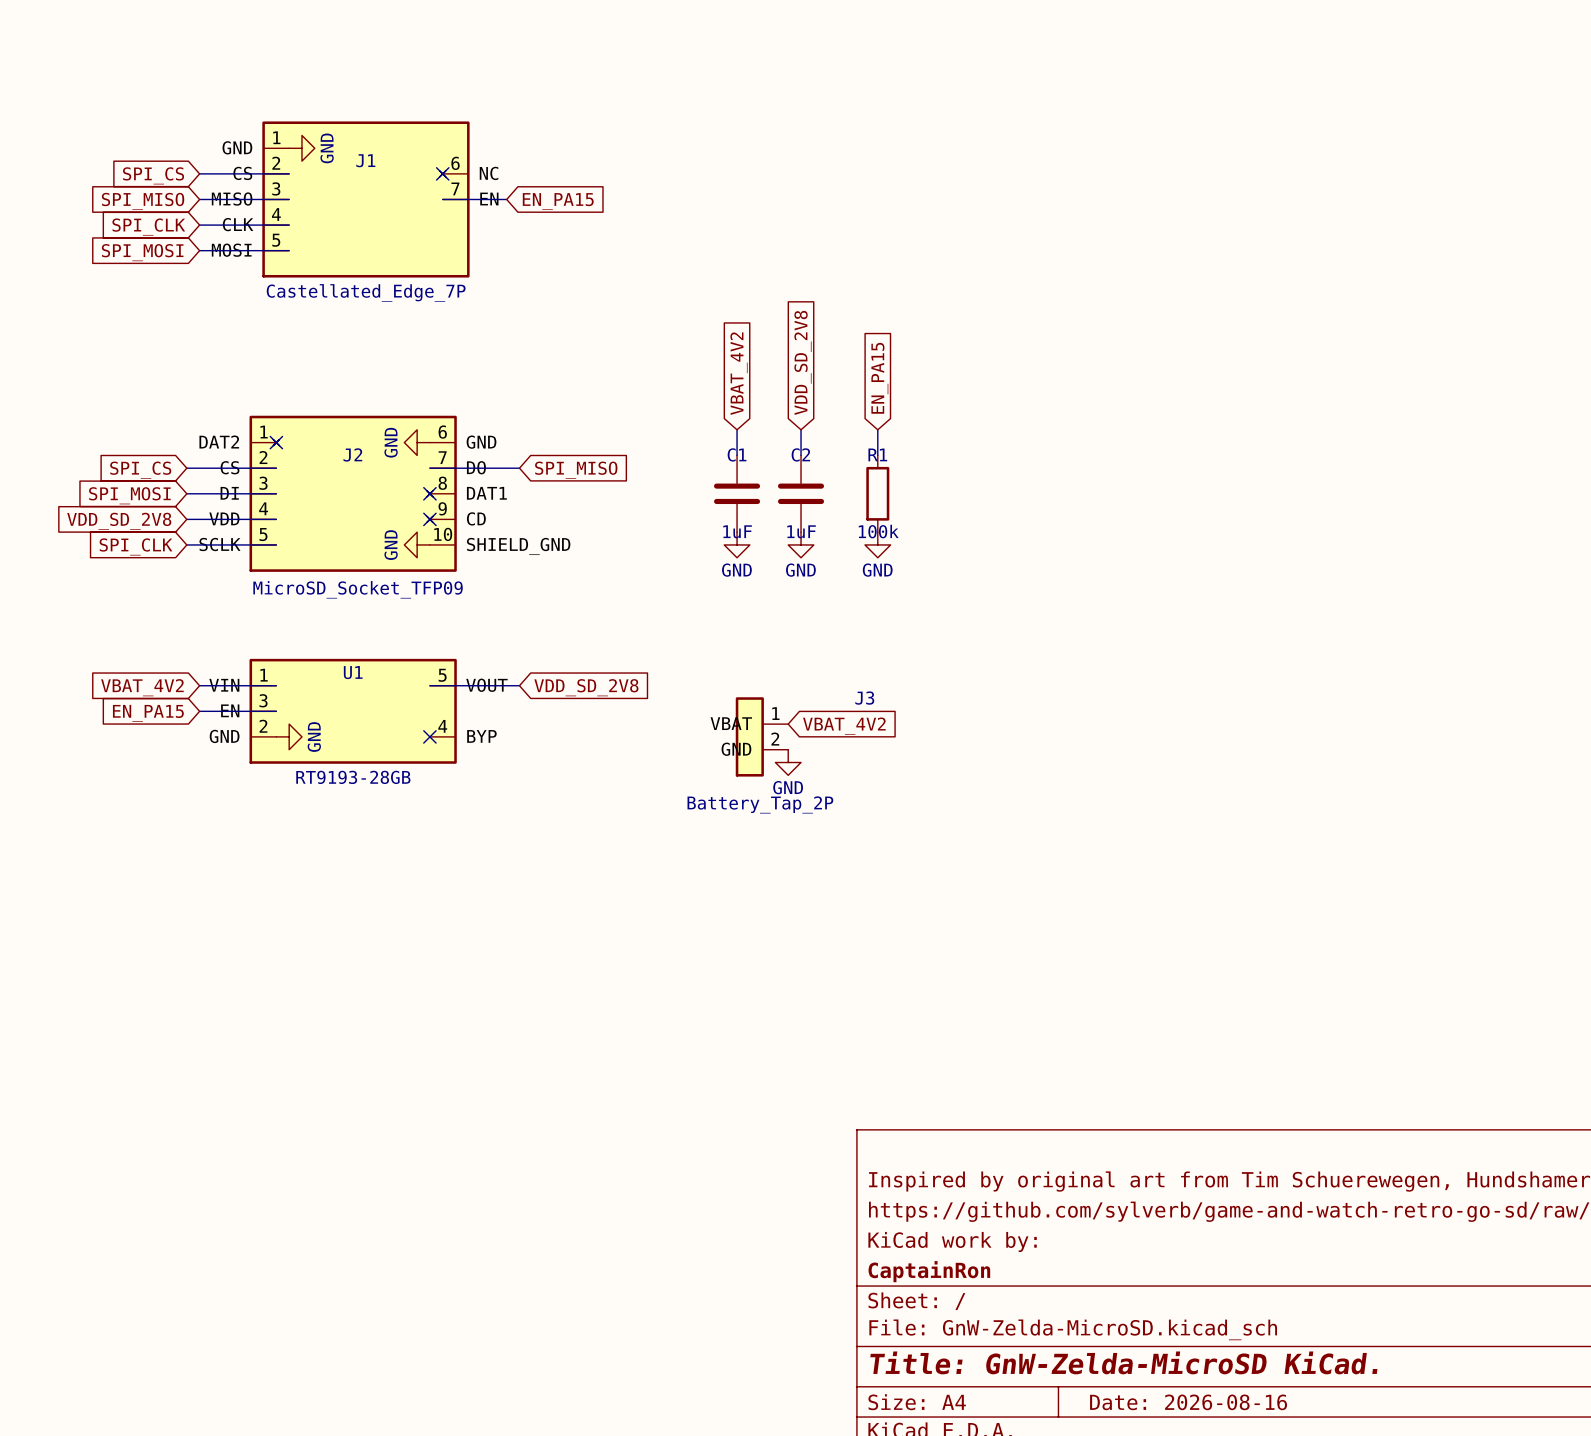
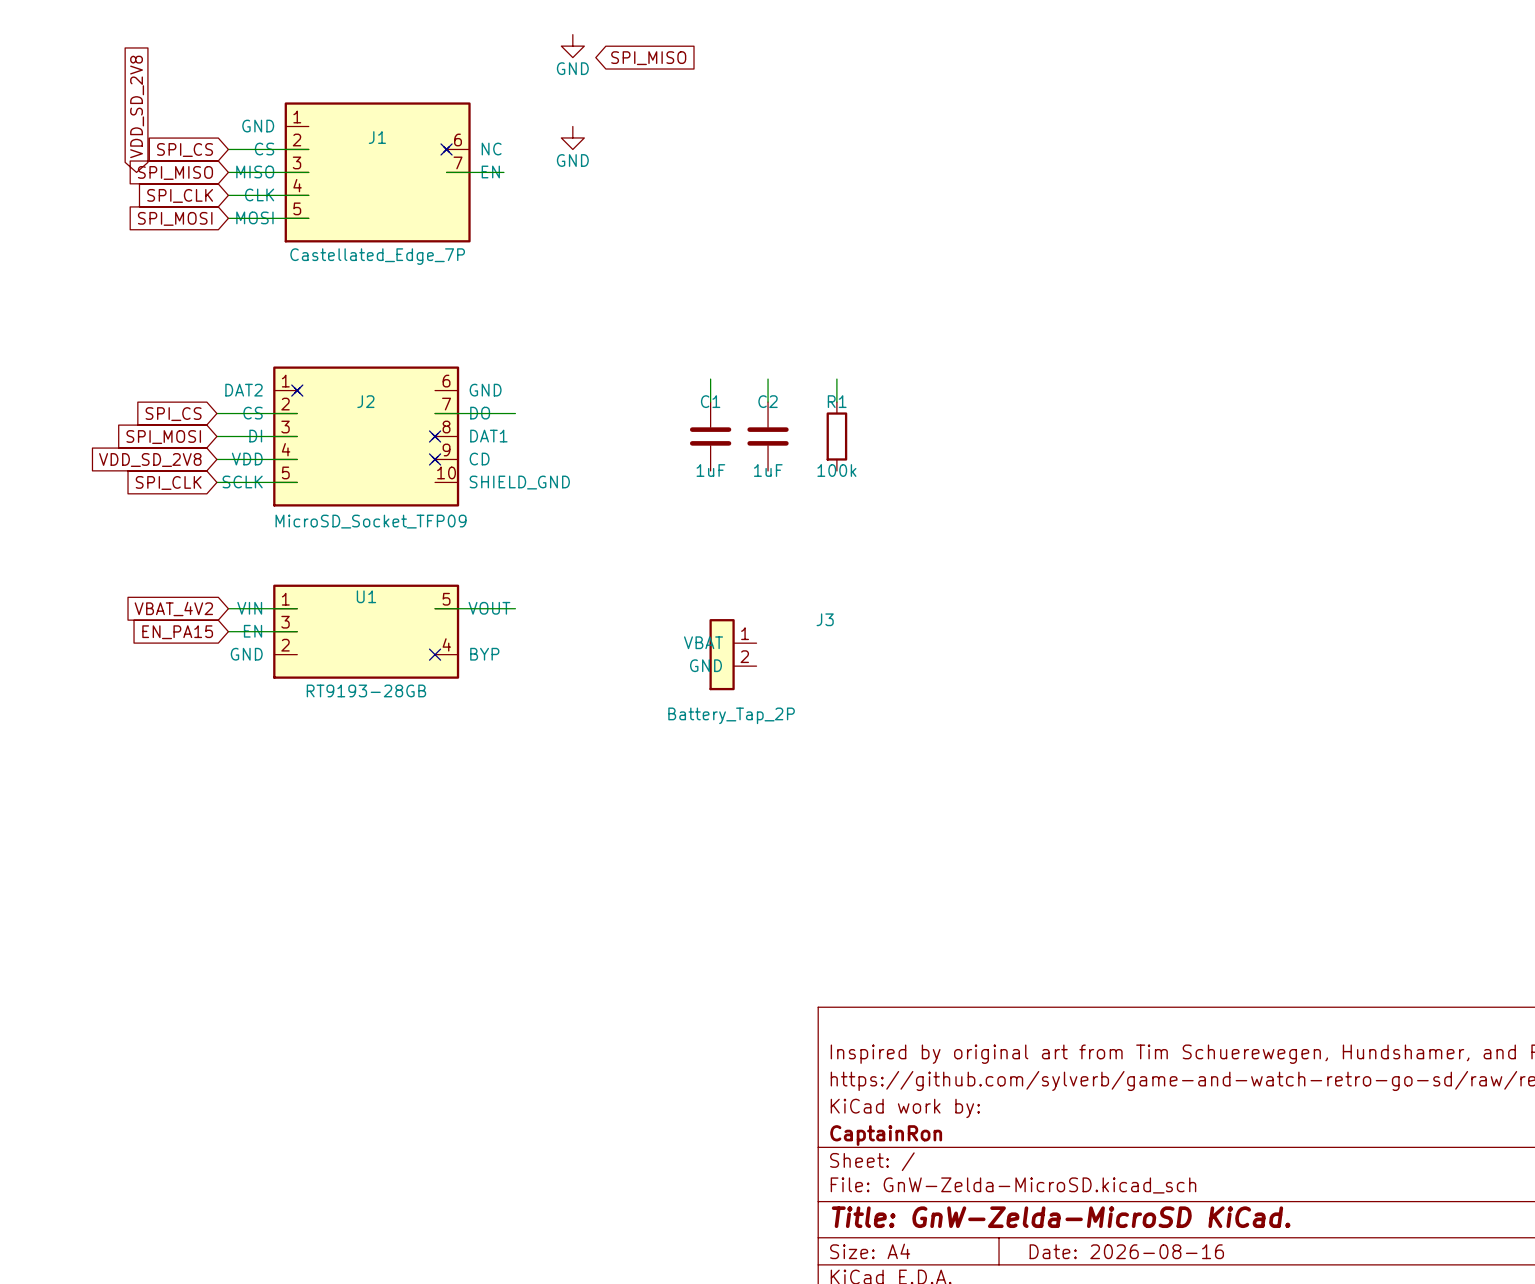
power symbol: none -> GND (572, 46)
global label: none -> SPI_MISO (648, 58)
global label: none -> VDD_SD_2V8 (137, 106)
power symbol: GND (301, 148) -> none
power symbol: none -> GND (572, 137)
global label: EN_PA15 (558, 201) -> none
global label: VDD_SD_2V8 (802, 362) -> none
global label: VBAT_4V2 (738, 373) -> none
global label: EN_PA15 (879, 378) -> none
power symbol: GND (417, 442) -> none
global label: SPI_MISO (576, 470) -> none
power symbol: GND (417, 544) -> none
power symbol: GND (737, 544) -> none
power symbol: GND (801, 544) -> none
power symbol: GND (877, 544) -> none
global label: VDD_SD_2V8 (586, 687) -> none
global label: VBAT_4V2 (844, 726) -> none
power symbol: GND (289, 736) -> none
power symbol: GND (788, 762) -> none

